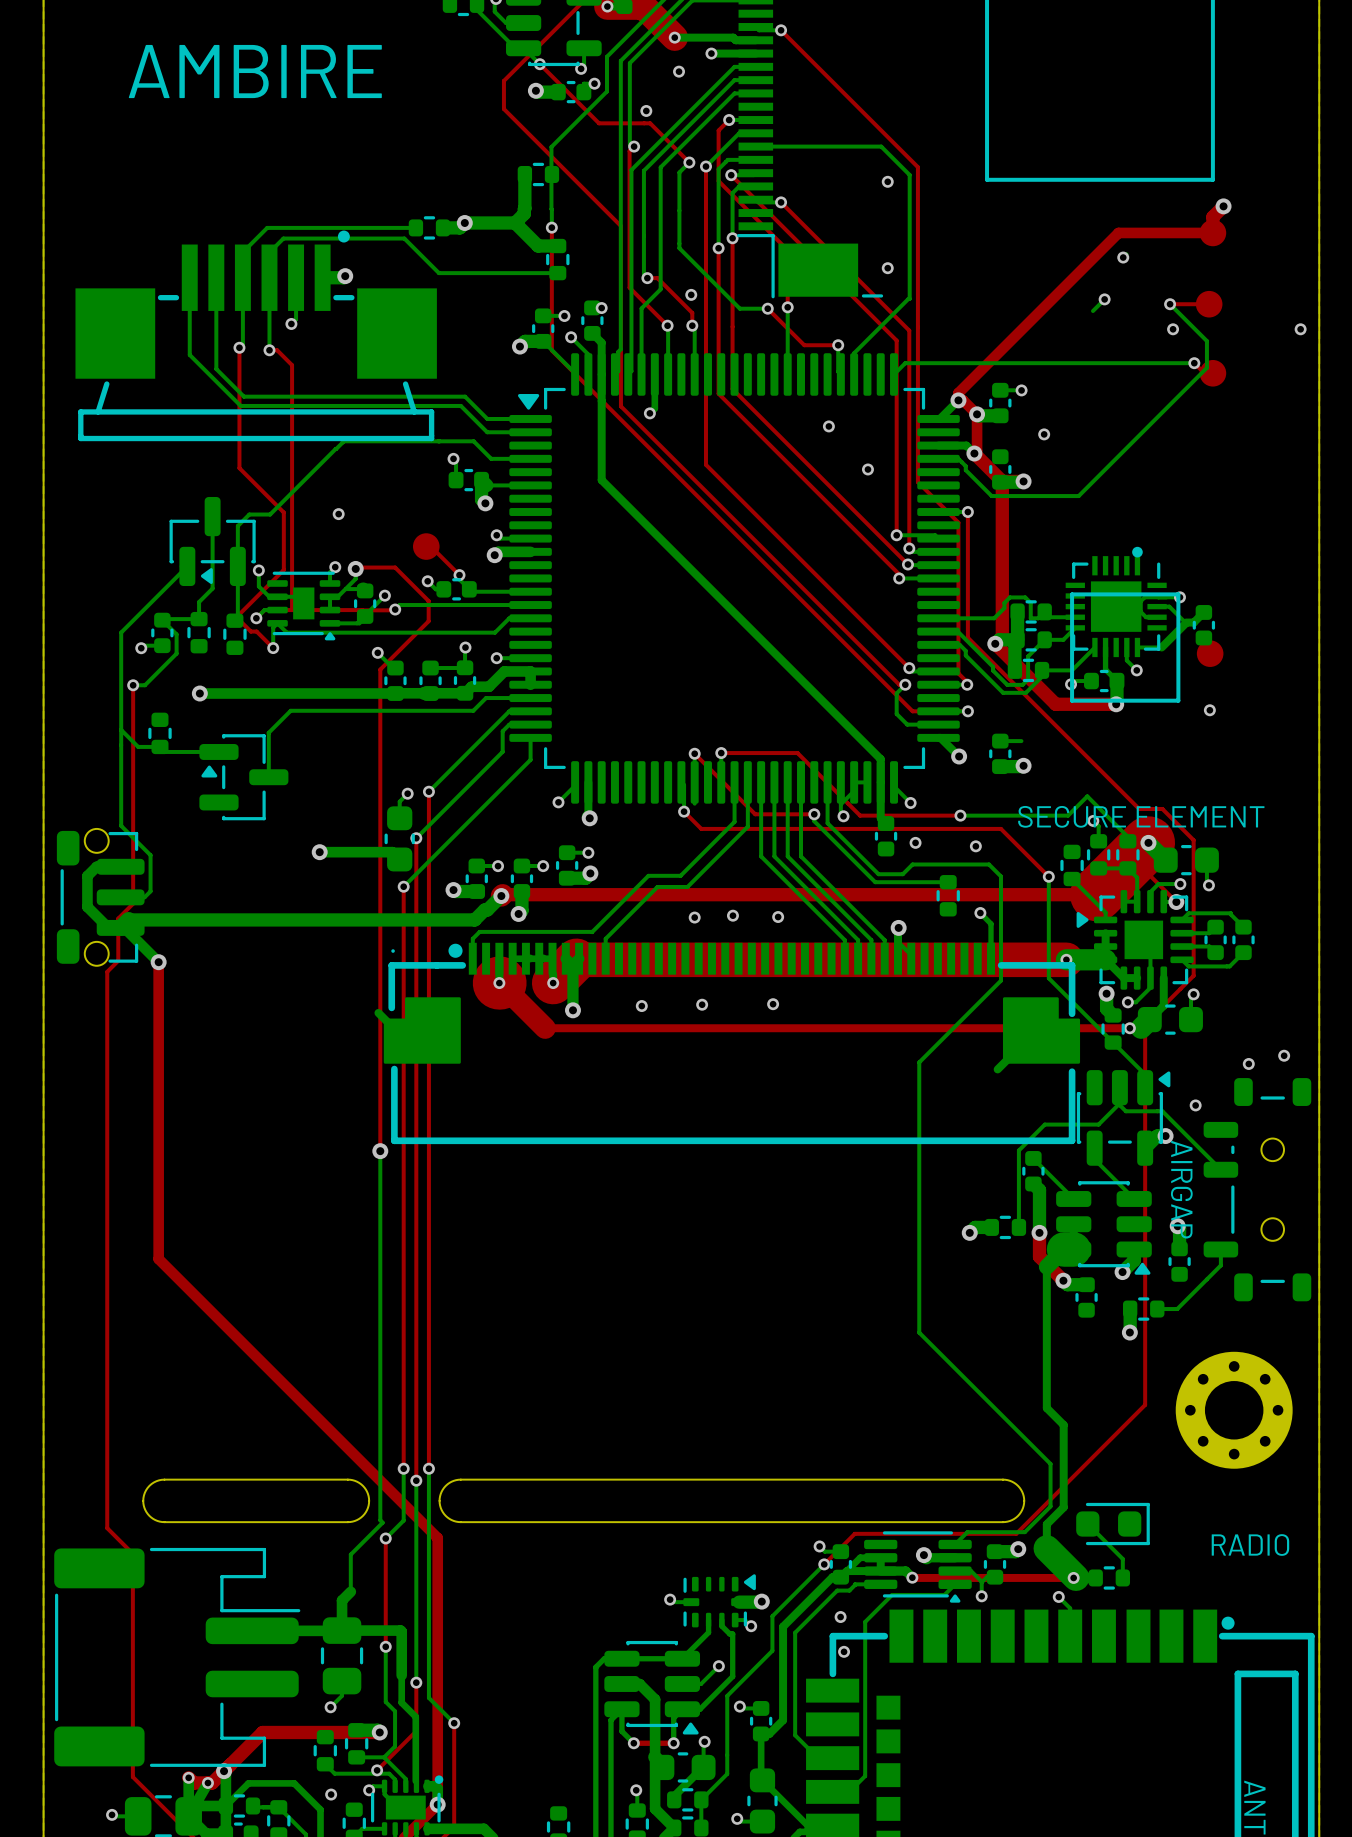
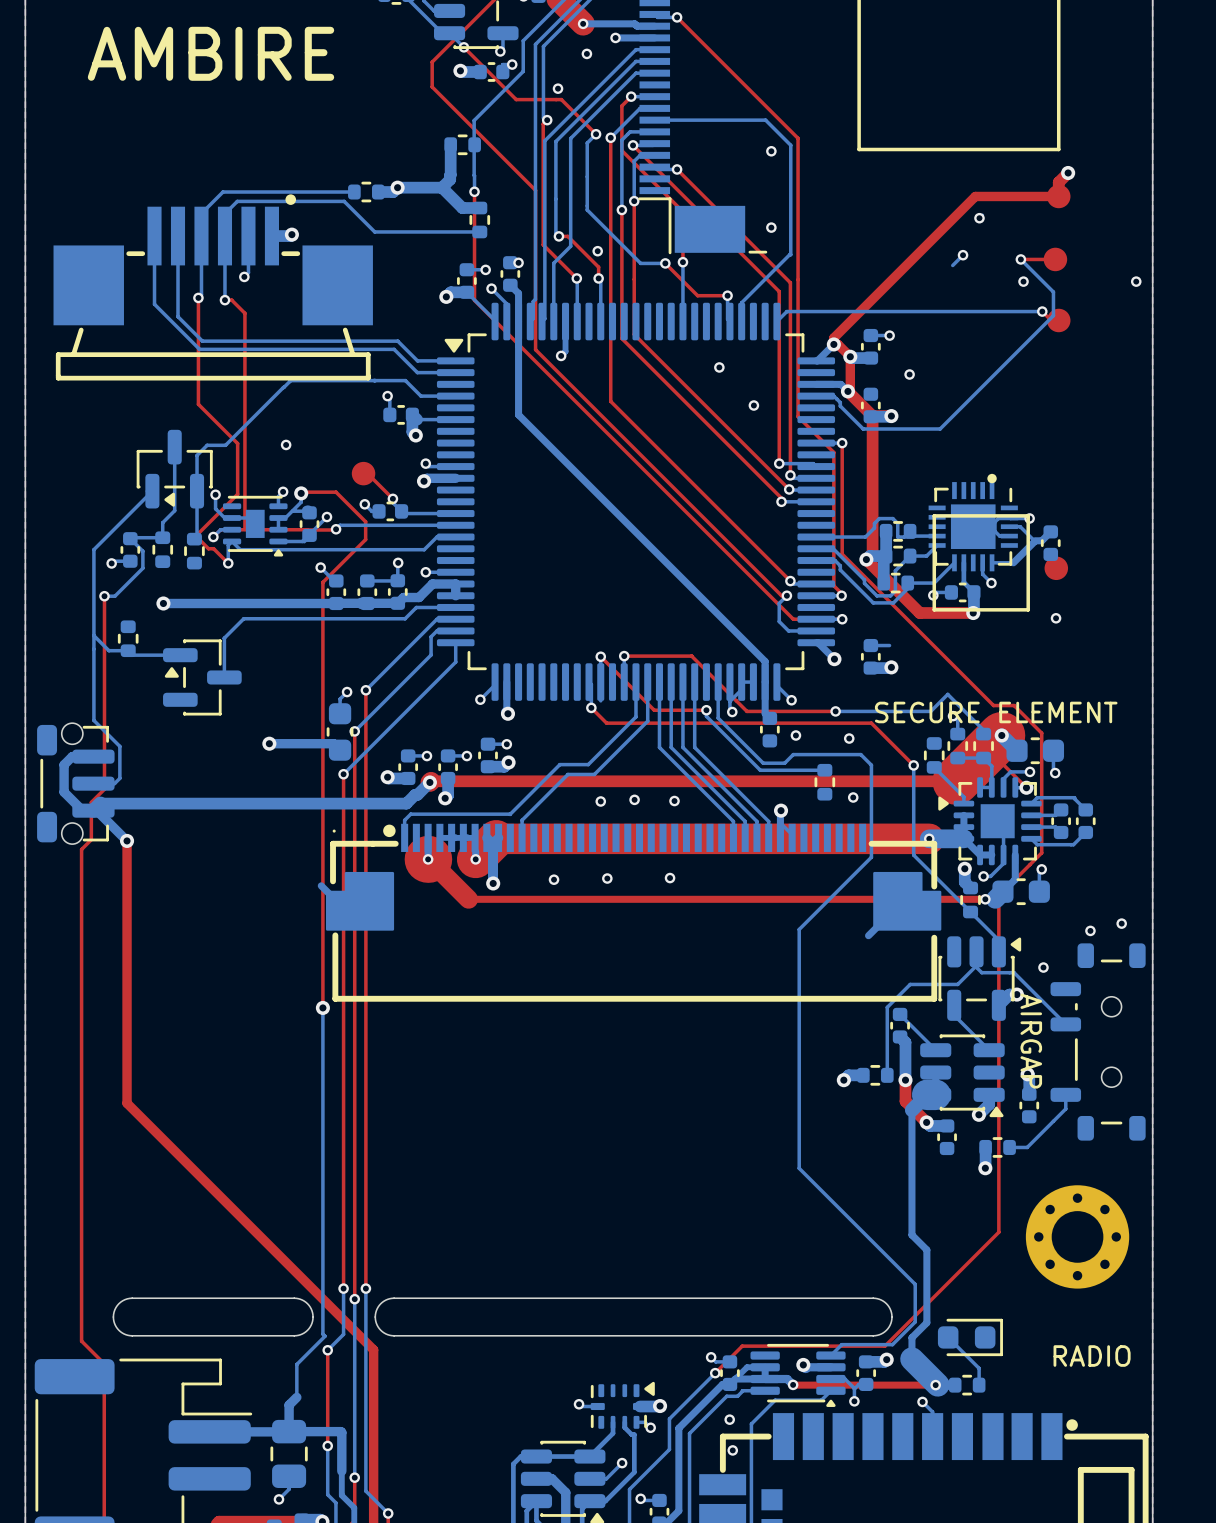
bottom track: (980, 913) (991, 923) (991, 958) -> none

